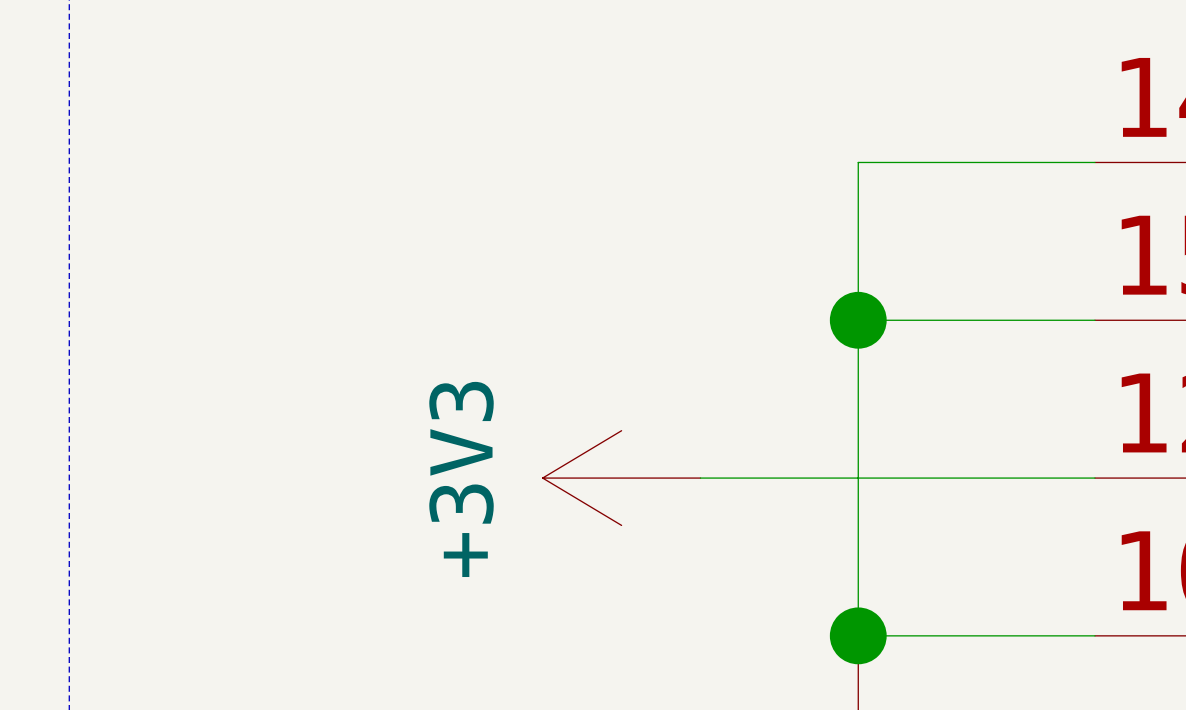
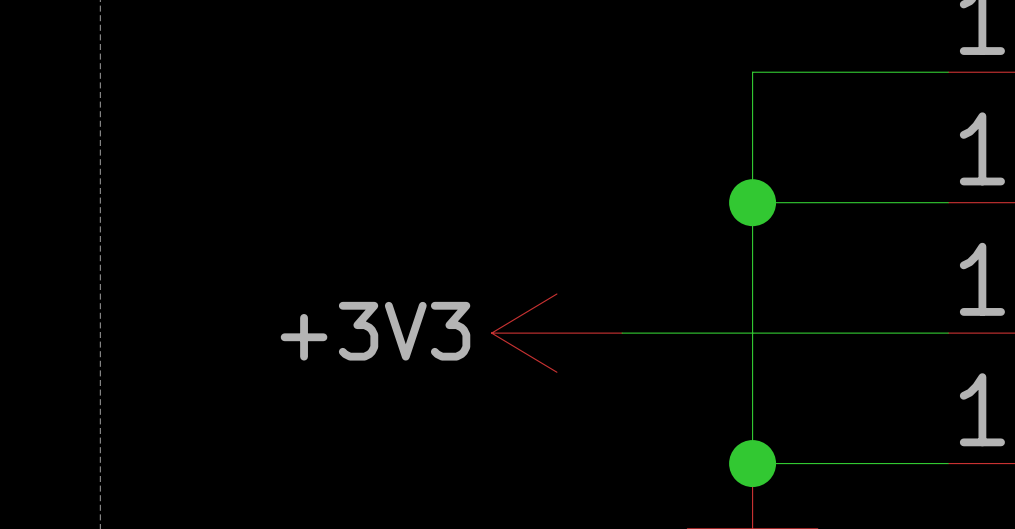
power symbol text rotation: 0° (461, 479) -> 90° clockwise (375, 331)

